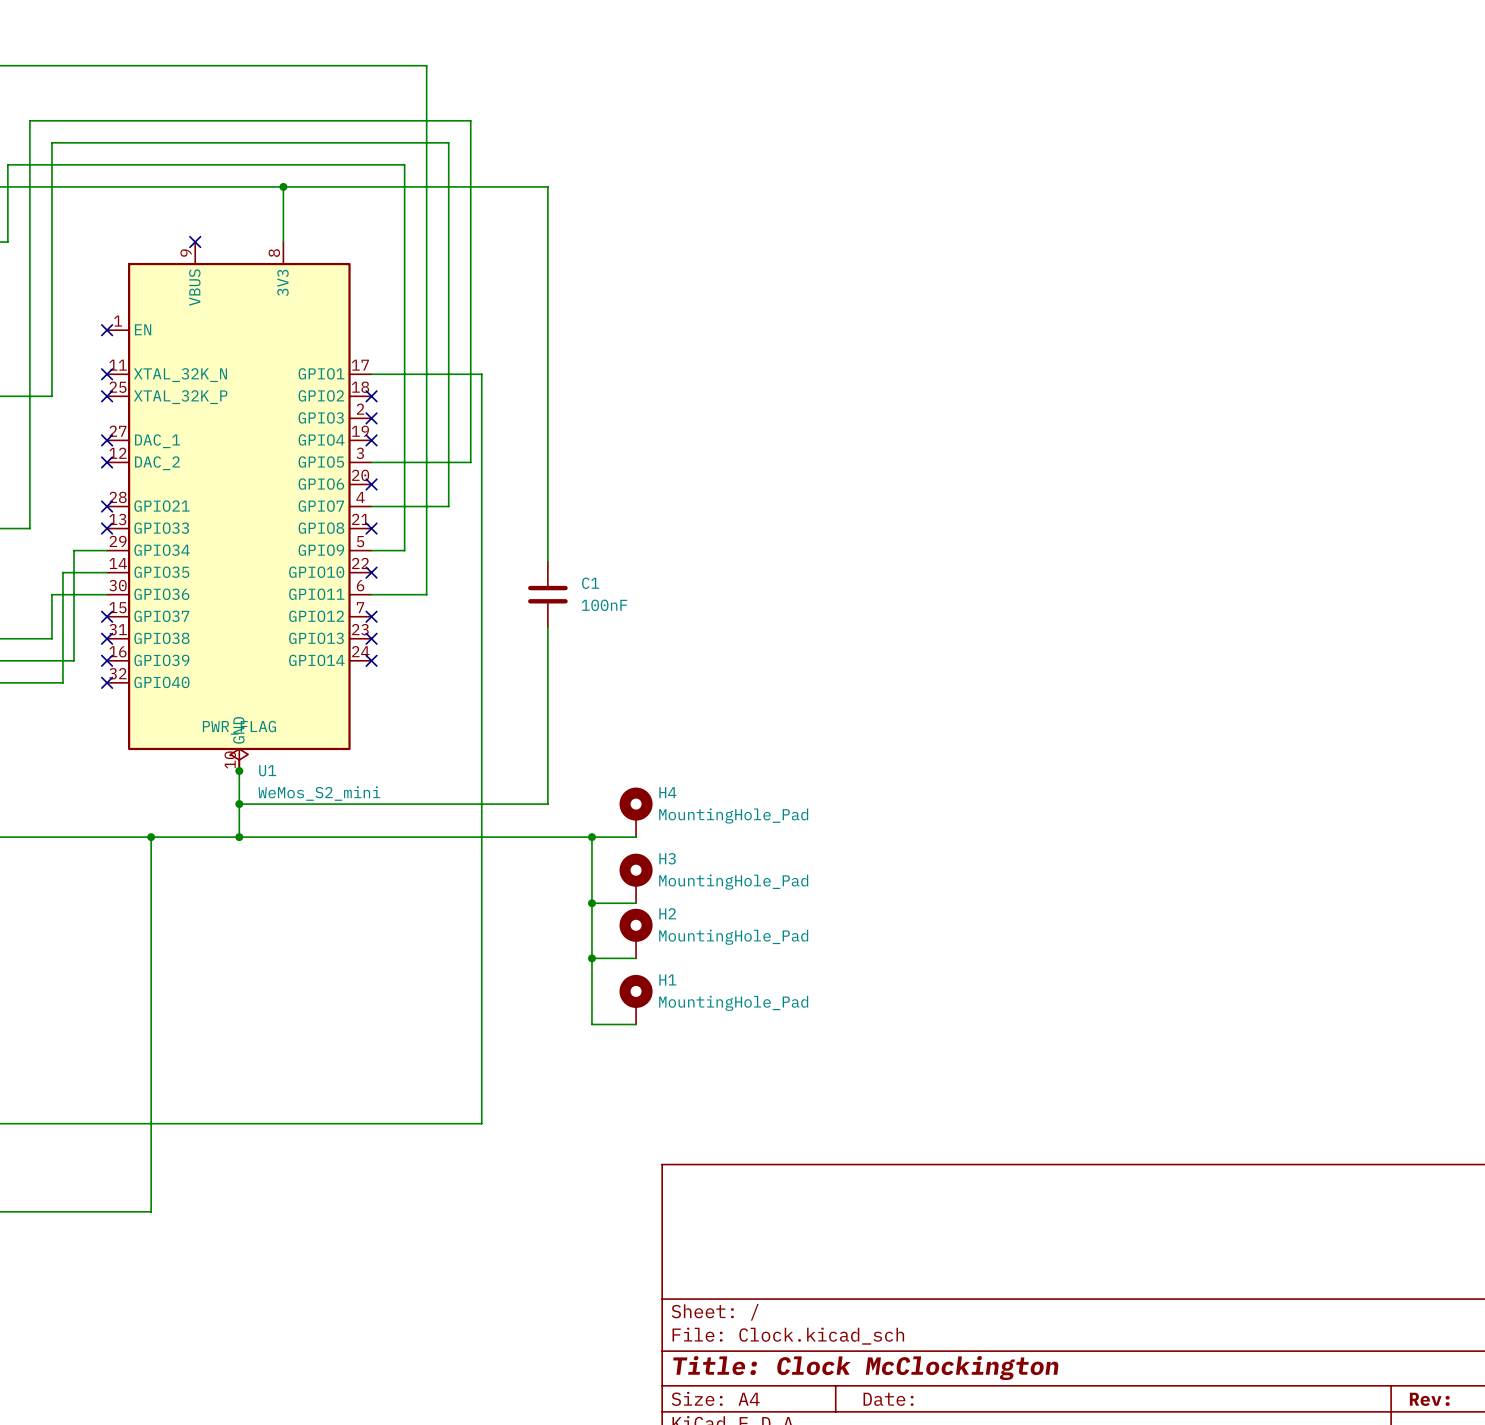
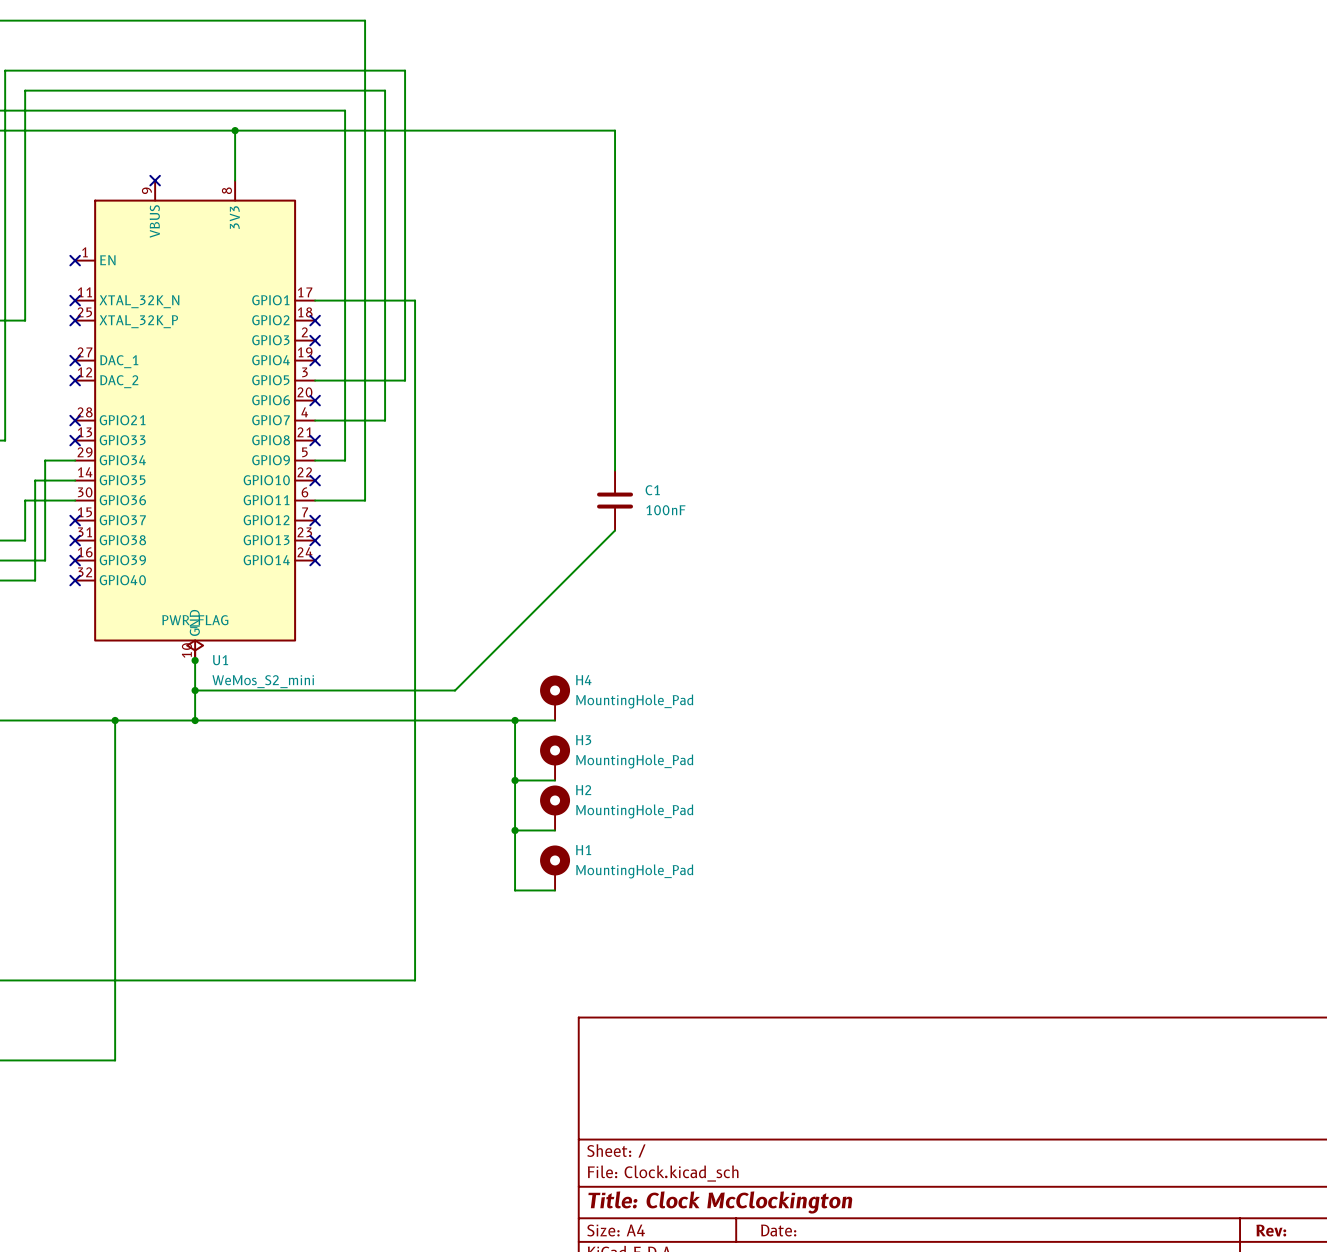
wire: (547, 186) (547, 561) -> (475, 130) (615, 130) (615, 470)
C1 position: (547, 594) -> (615, 500)
wire: (547, 627) (547, 804) (525, 804) -> (615, 530) (455, 690)

